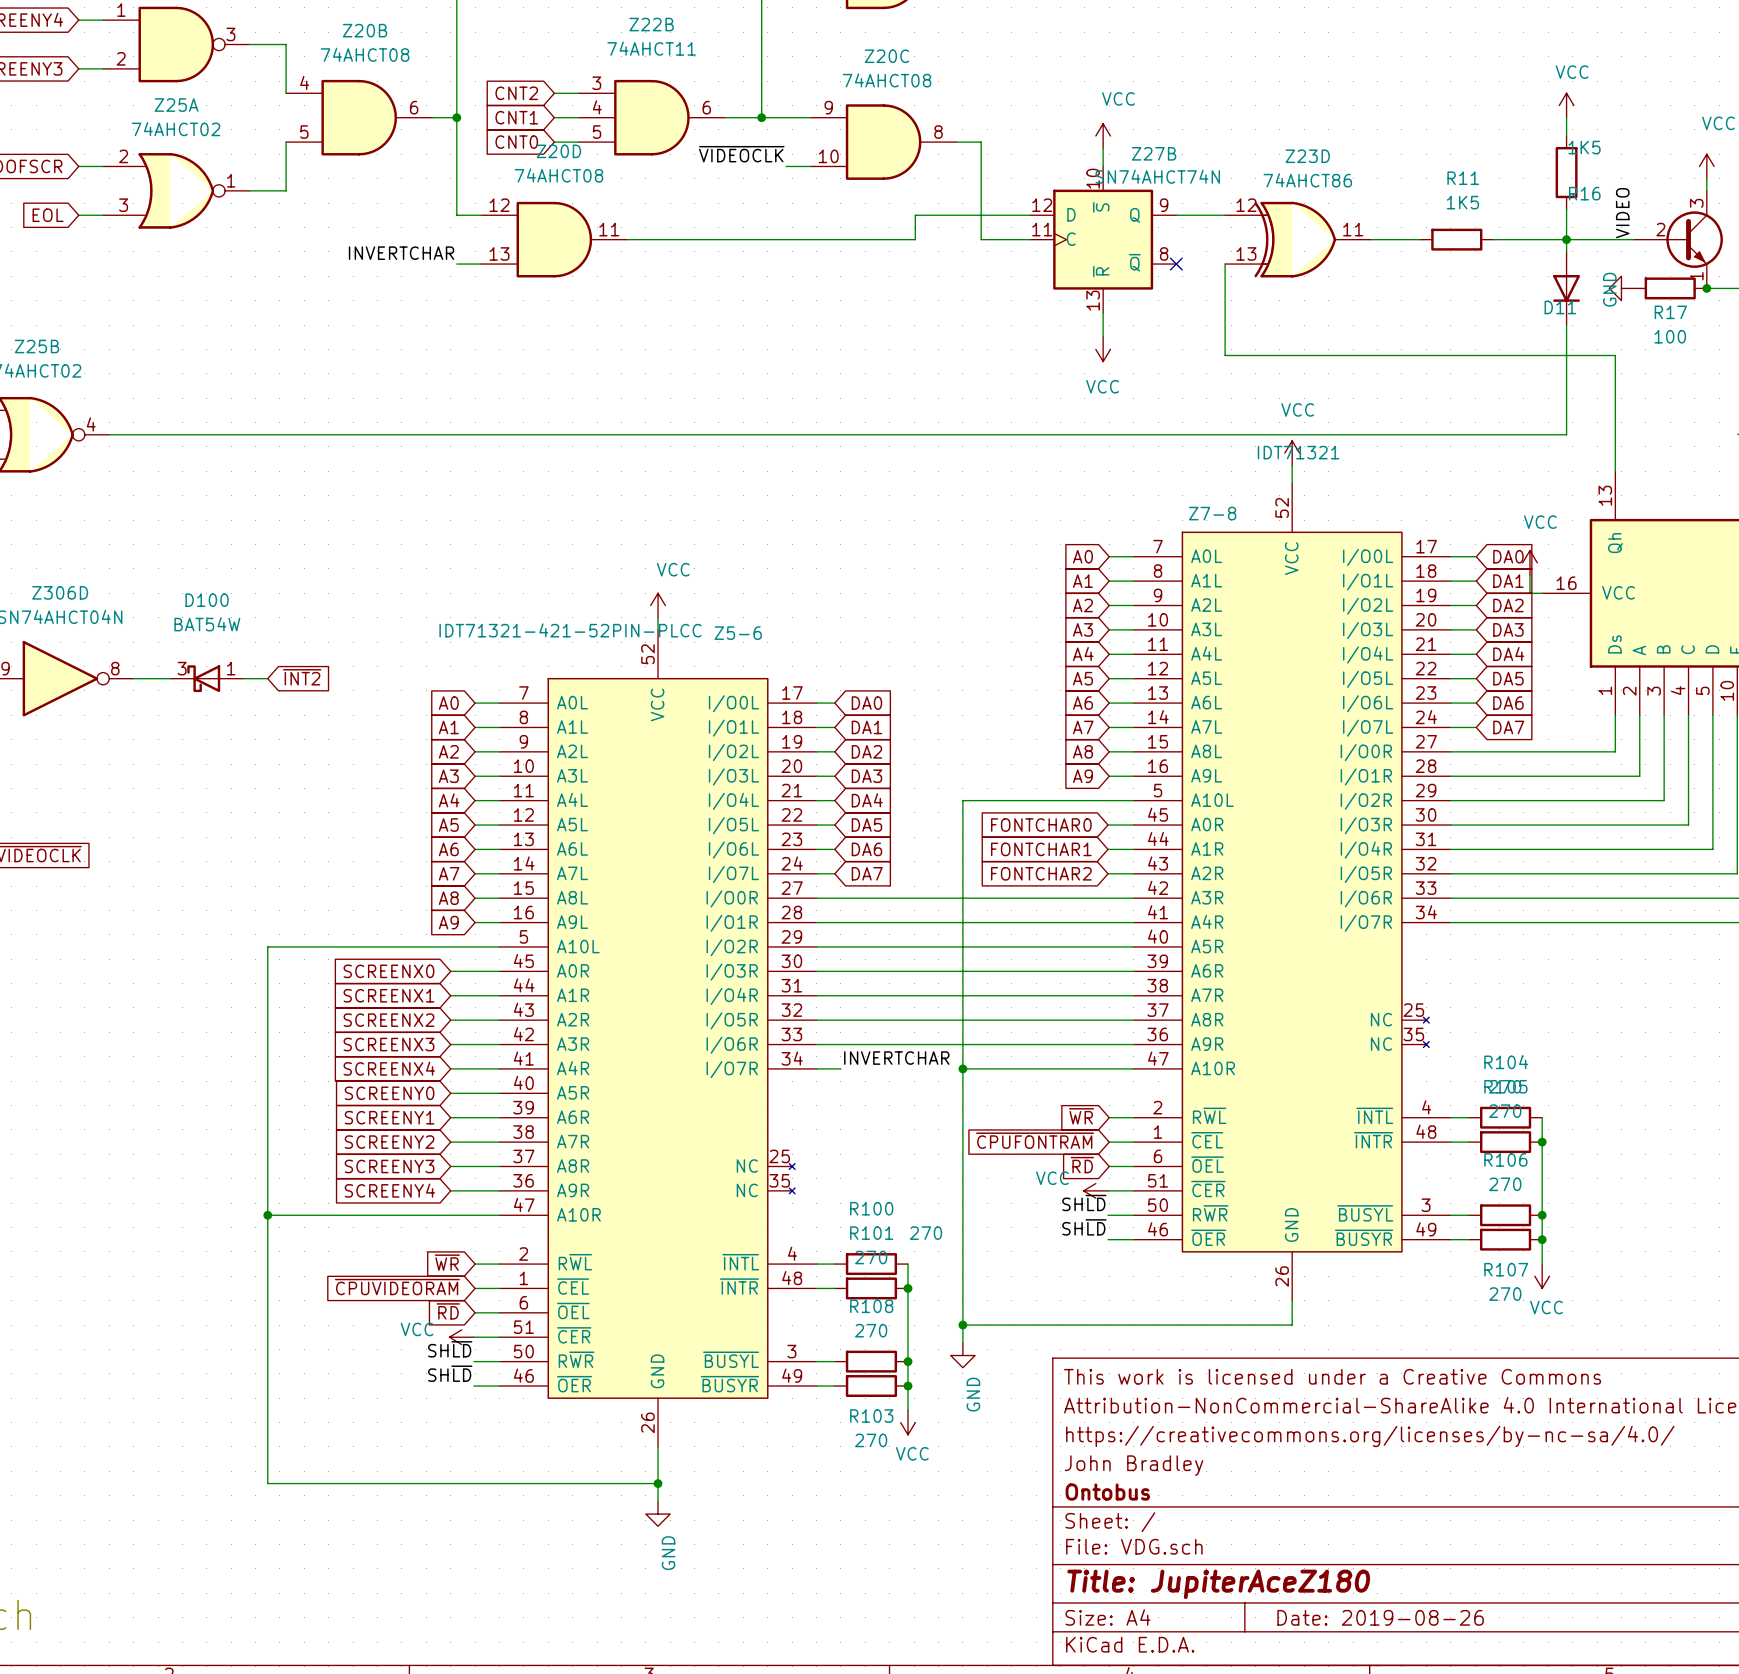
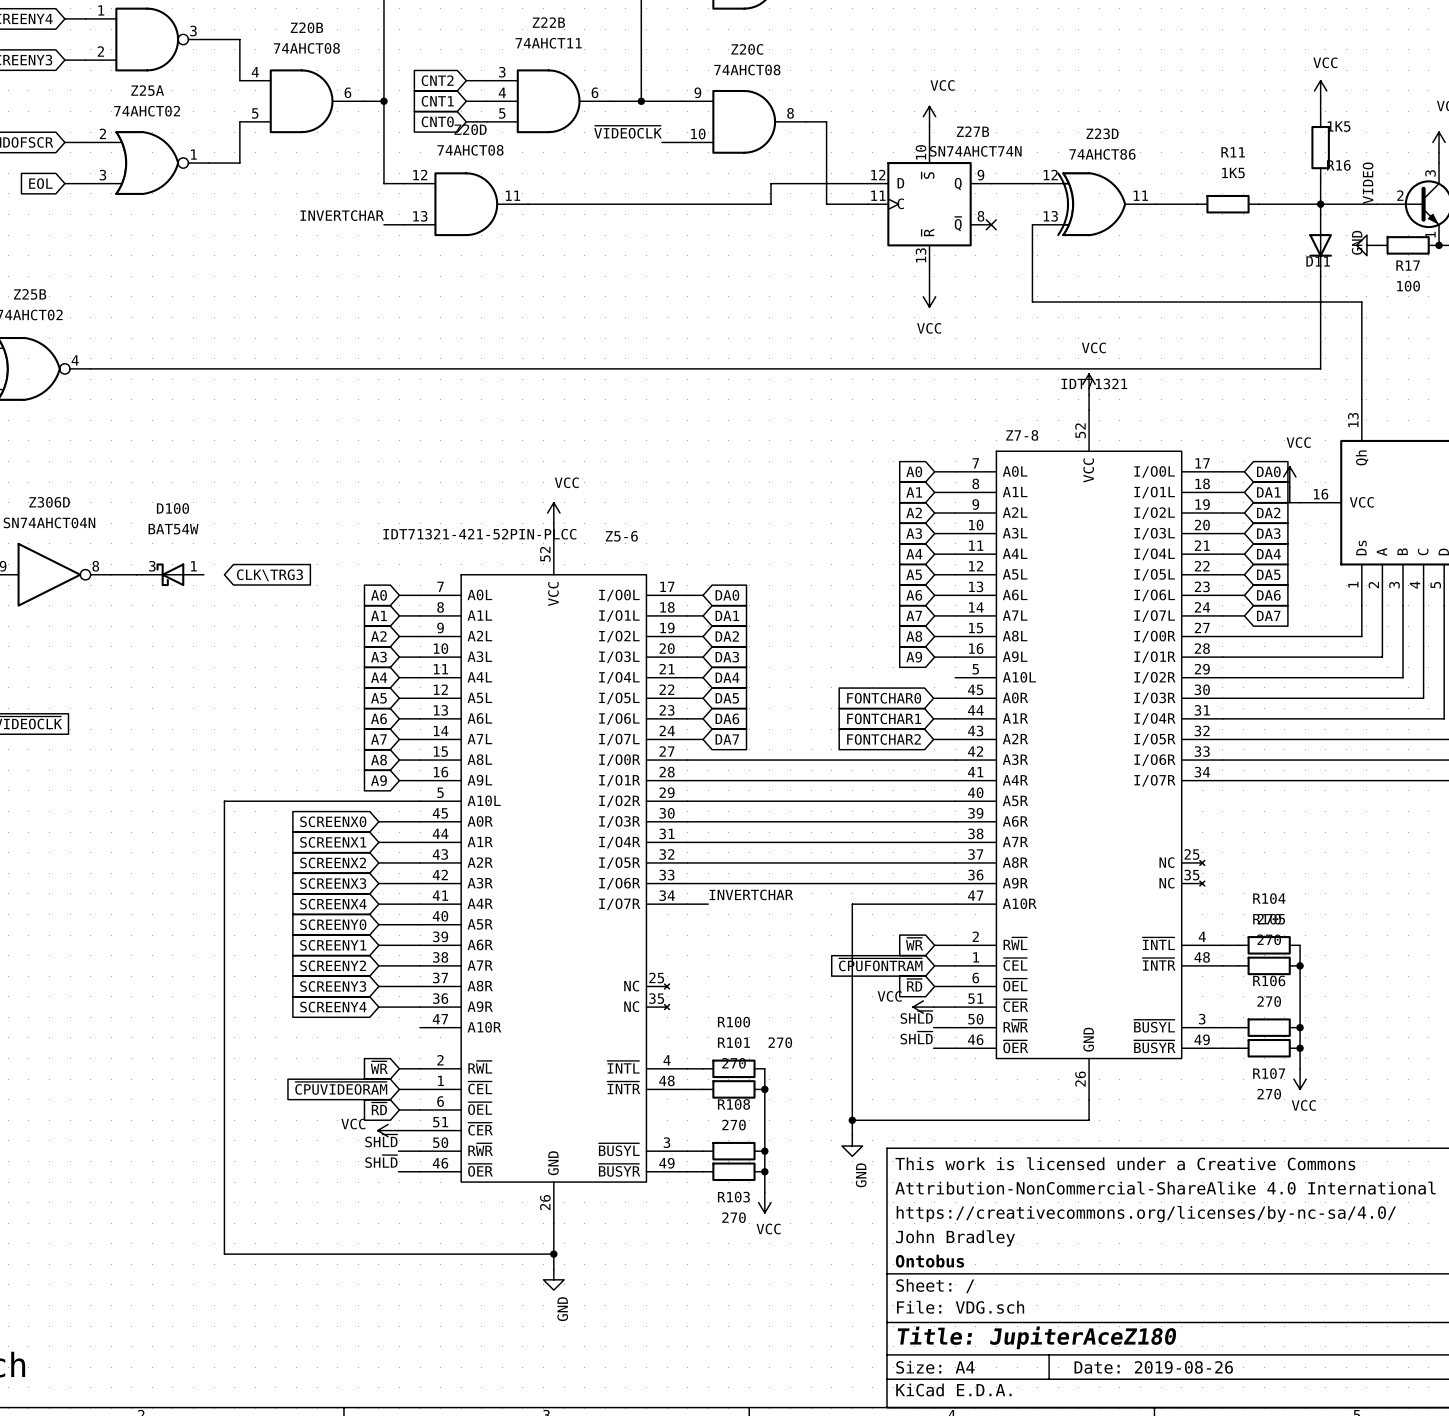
global label: ~{INT2} (302, 677) -> CLK\TRG3 (269, 575)
wire: (243, 678) (267, 678) -> none
wire: (1133, 800) (962, 800) (962, 1343) -> none
wire: (962, 1068) (1011, 1068) -> (852, 1135) (852, 904)
junction: (962, 1068) -> none
wire: (267, 1215) (499, 1215) -> none
junction: (267, 1215) -> none
wire: (962, 1325) (1011, 1325) -> none
junction position: (962, 1325) -> (852, 1120)
power symbol position: GND (962, 1355) -> GND (852, 1146)

